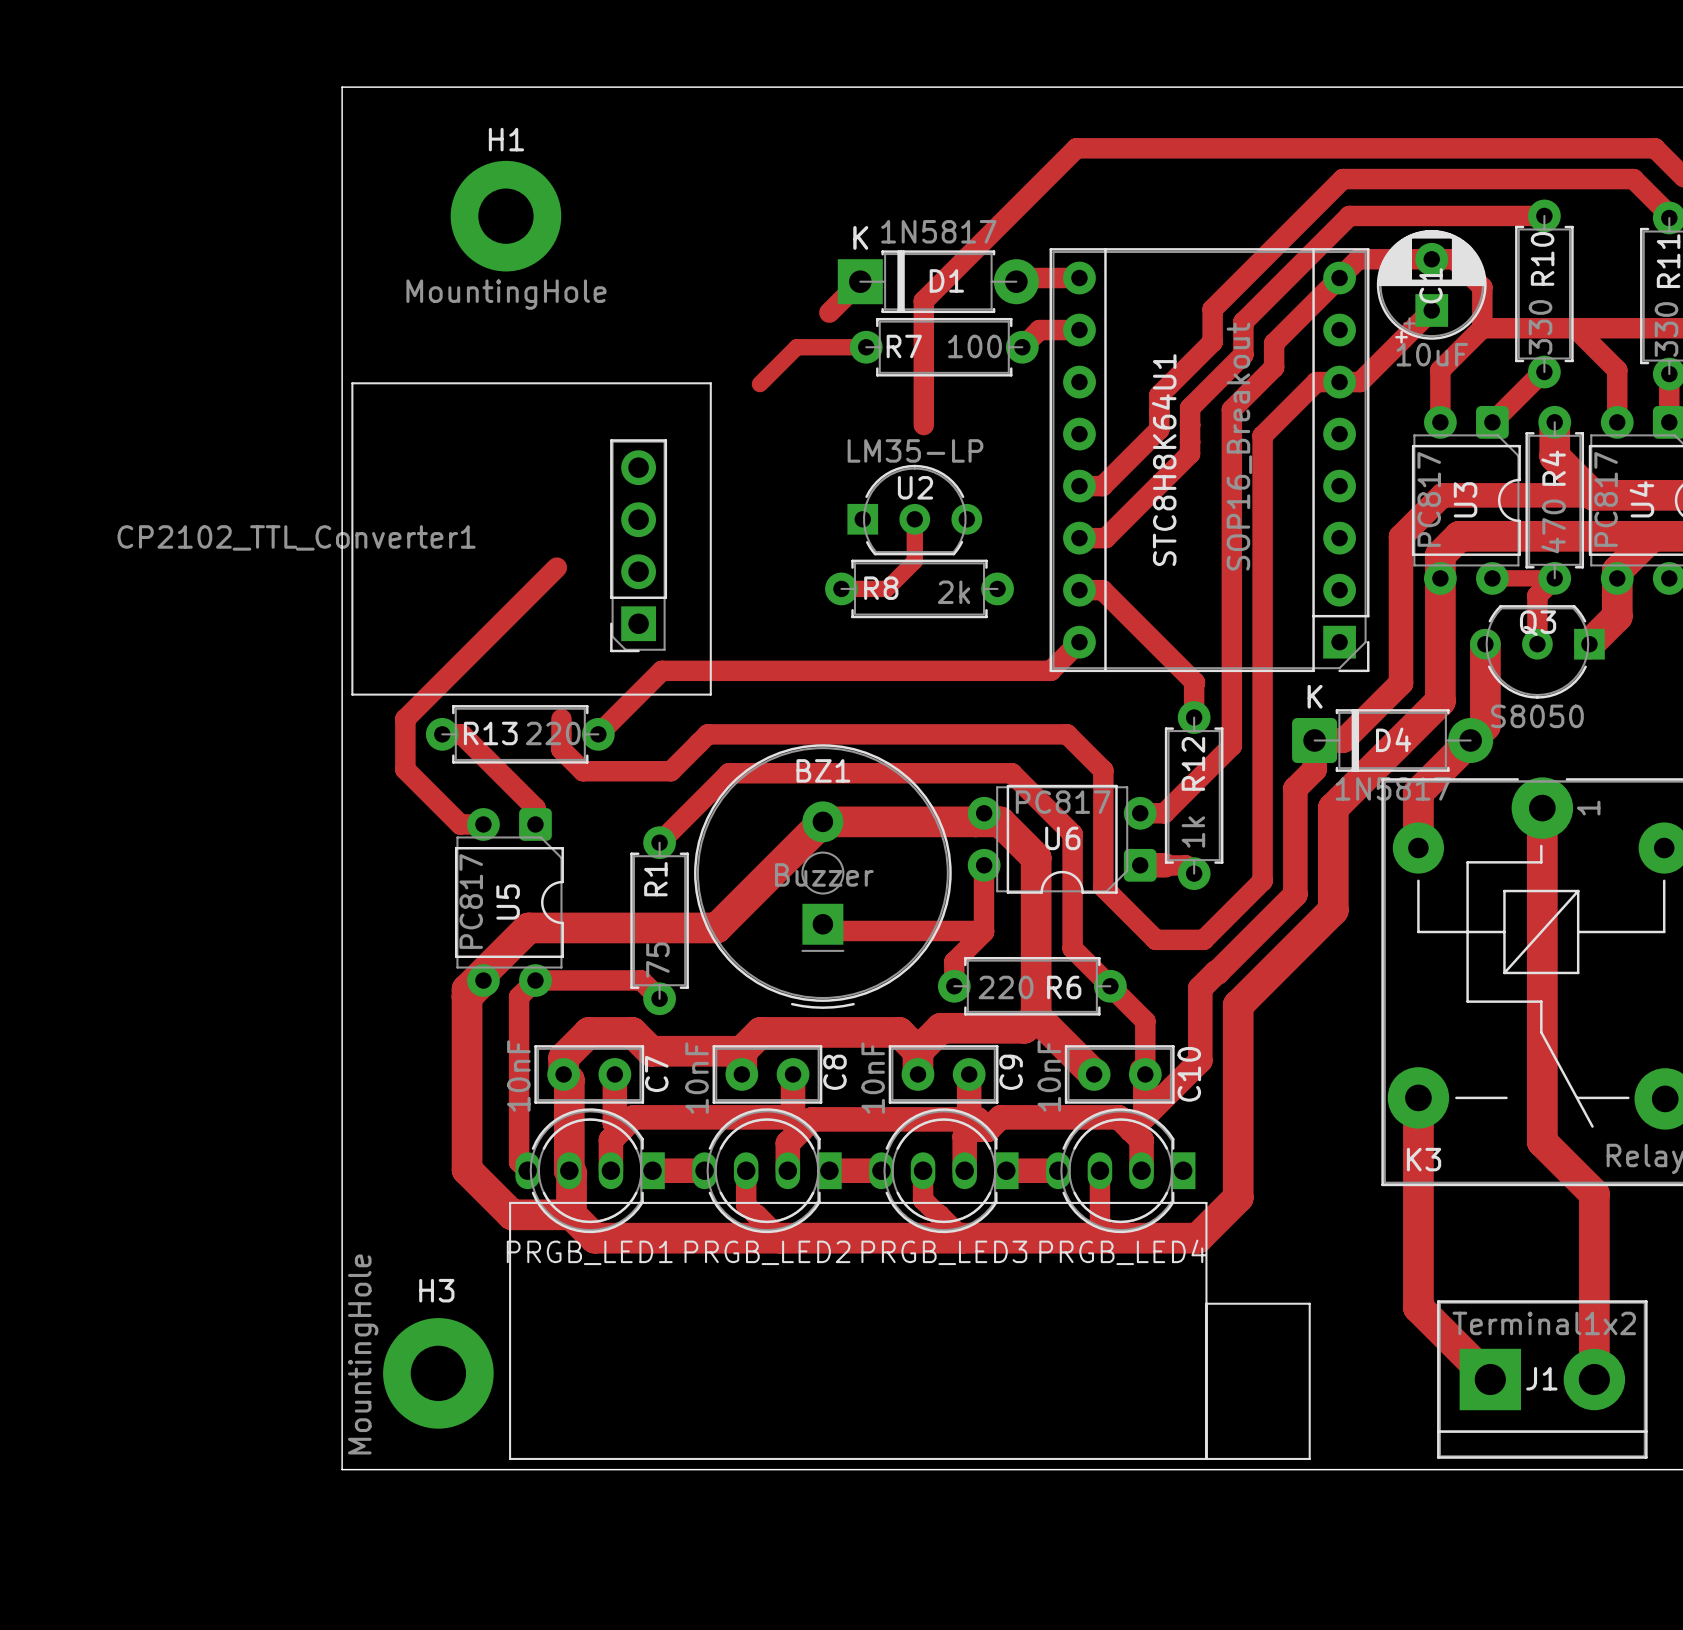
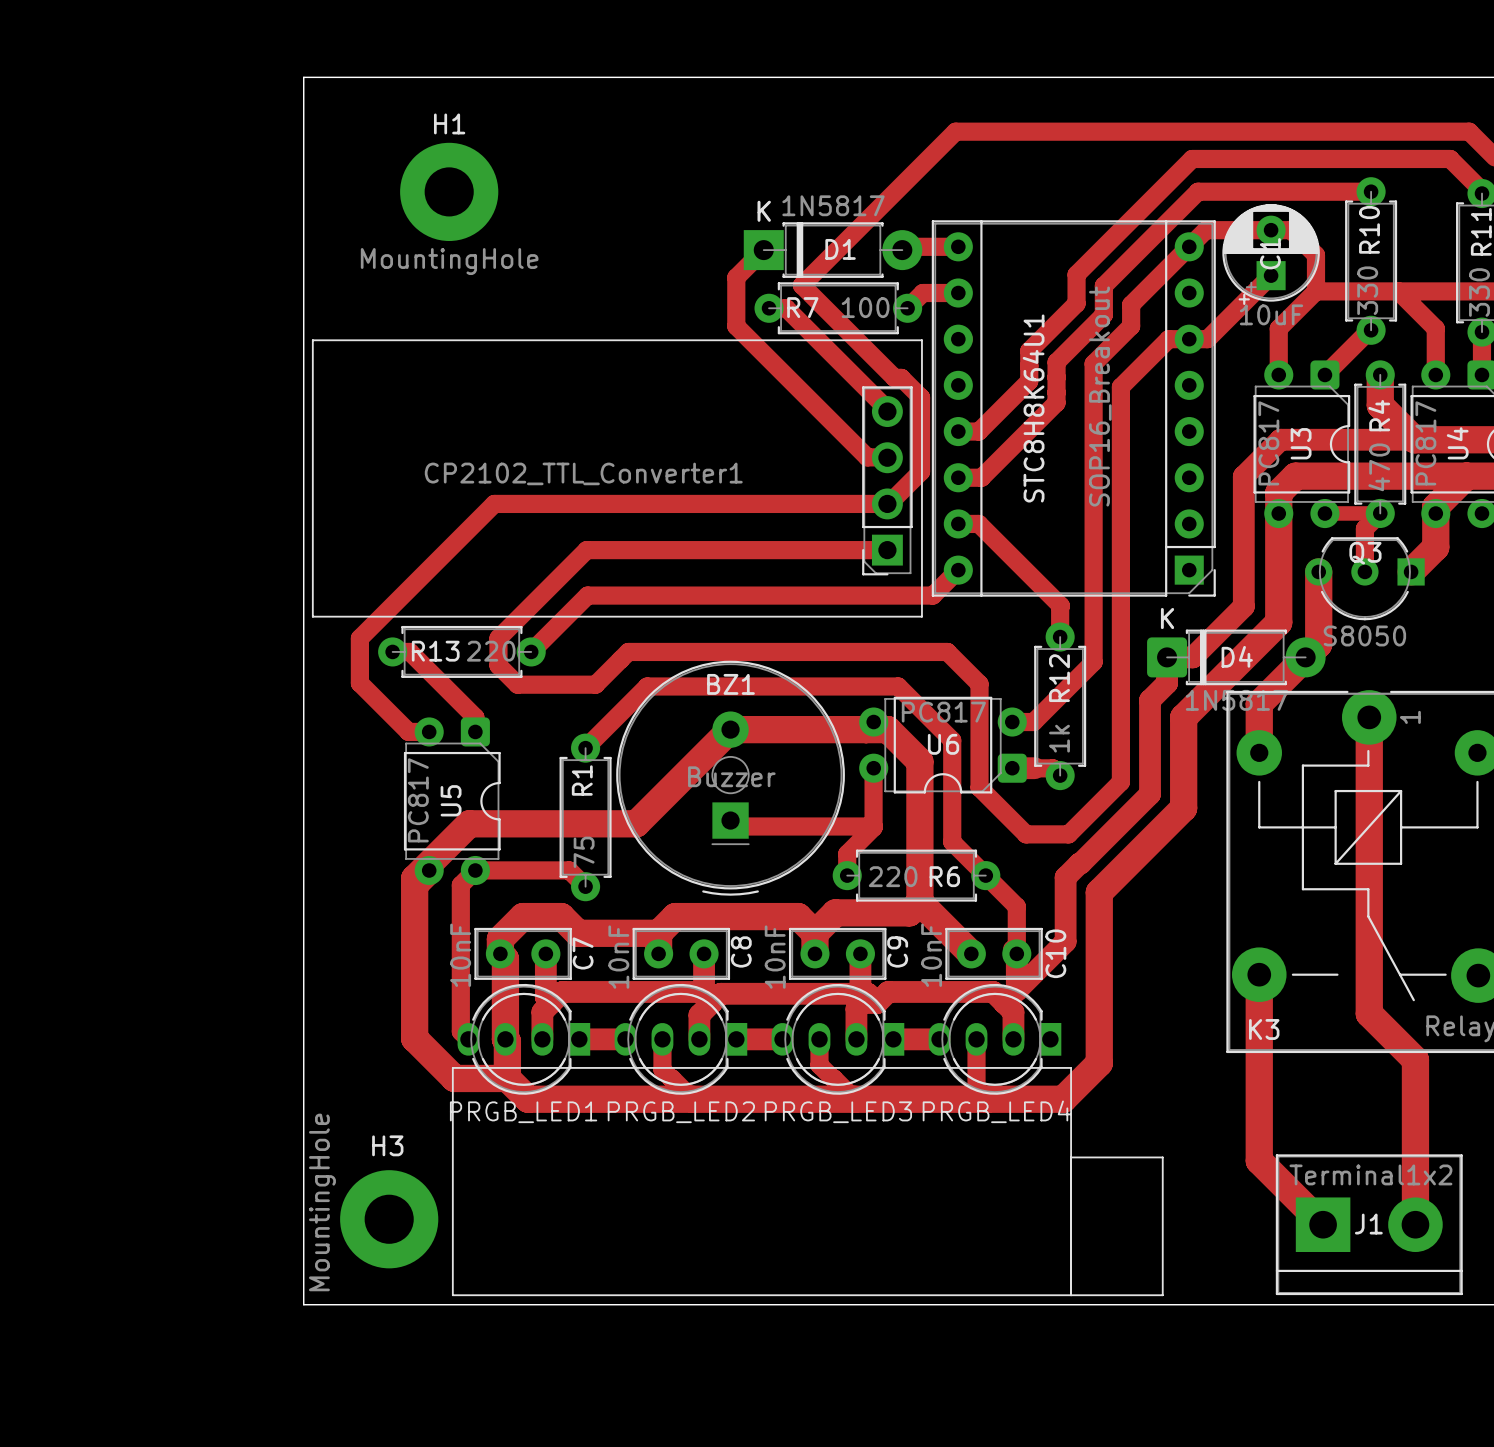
track: (923, 300) (923, 425) -> (820, 267) (801, 285) (894, 377) (901, 377) (921, 397) (921, 471) (888, 503) (494, 503)
track: none -> (736, 277) (736, 326) (867, 457) (889, 457)
track: (866, 347) (796, 347) (759, 384) -> (769, 308) (786, 308) (889, 411)
line: (710, 383) (710, 694) -> (631, 340) (921, 340) (921, 616) (631, 616)
U2: LM35-LP (914, 510) -> none
track: (914, 519) (914, 561) (887, 588) (841, 588) -> none
CP2102_TTL_Converter1 position: (638, 545) -> (887, 480)
R8: 2k (919, 588) -> none
track: none -> (887, 550) (586, 550) (498, 638)

